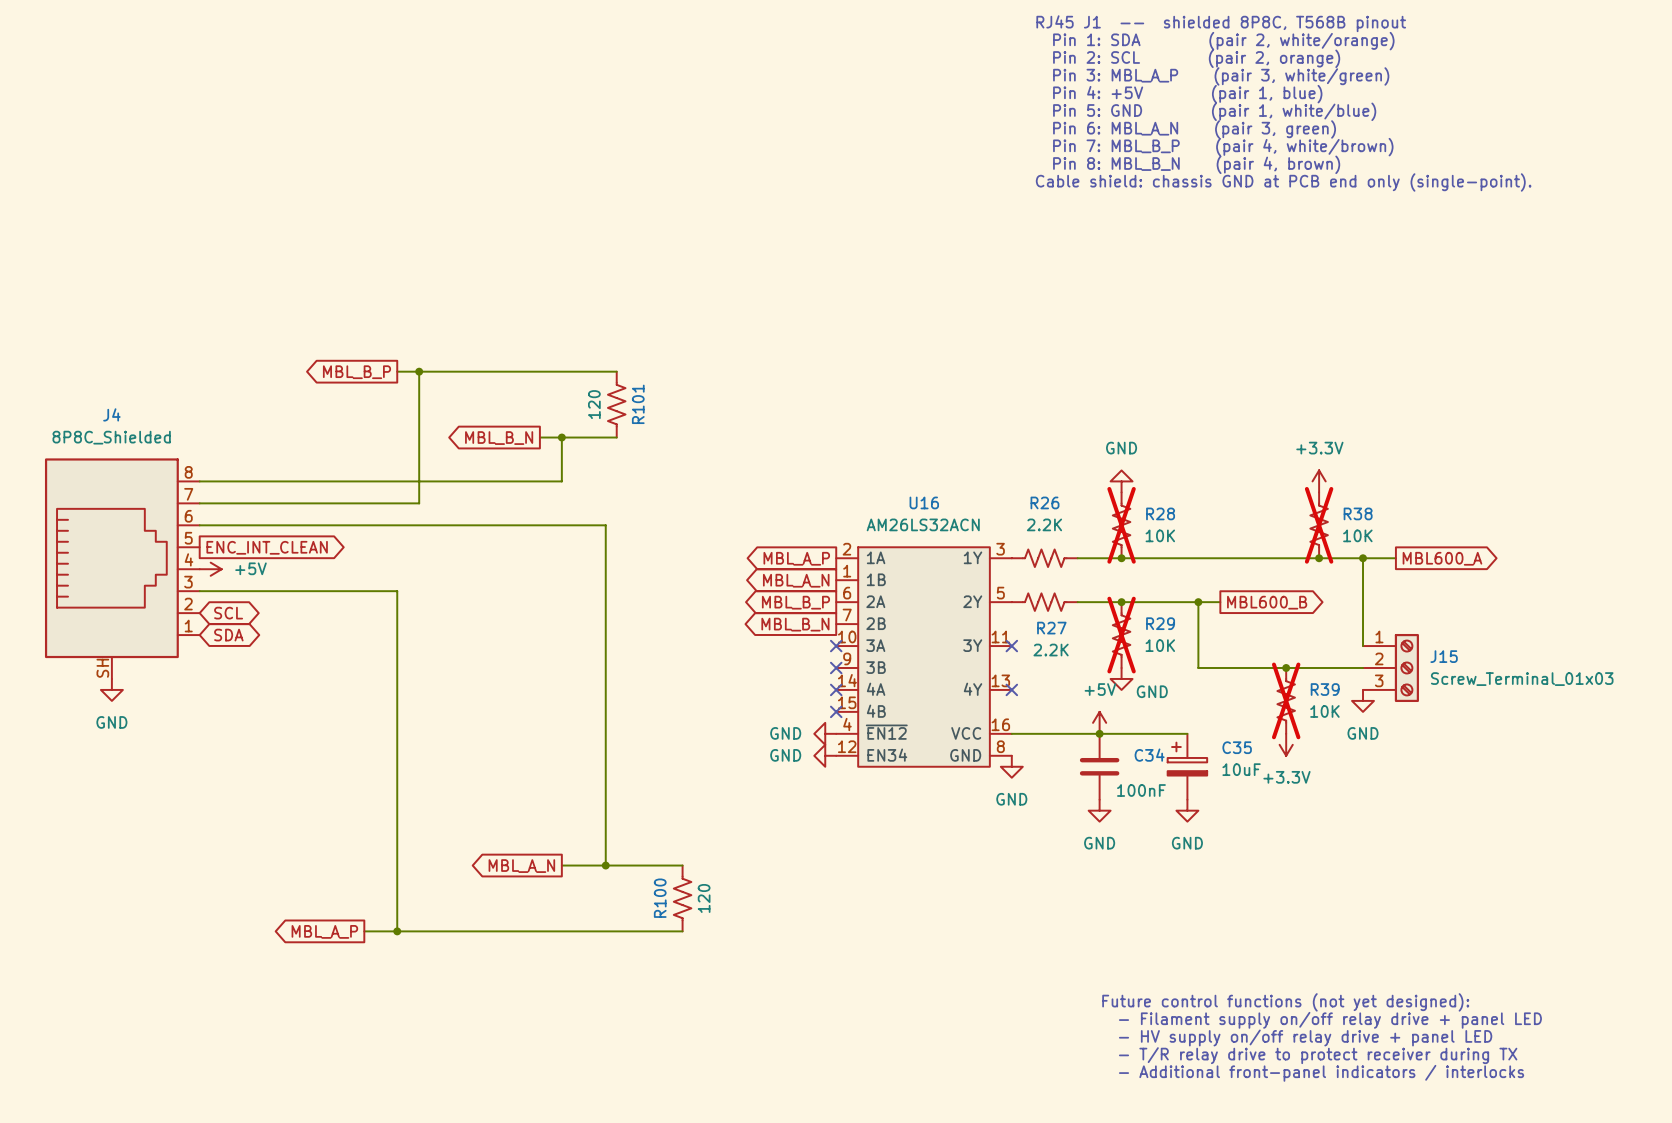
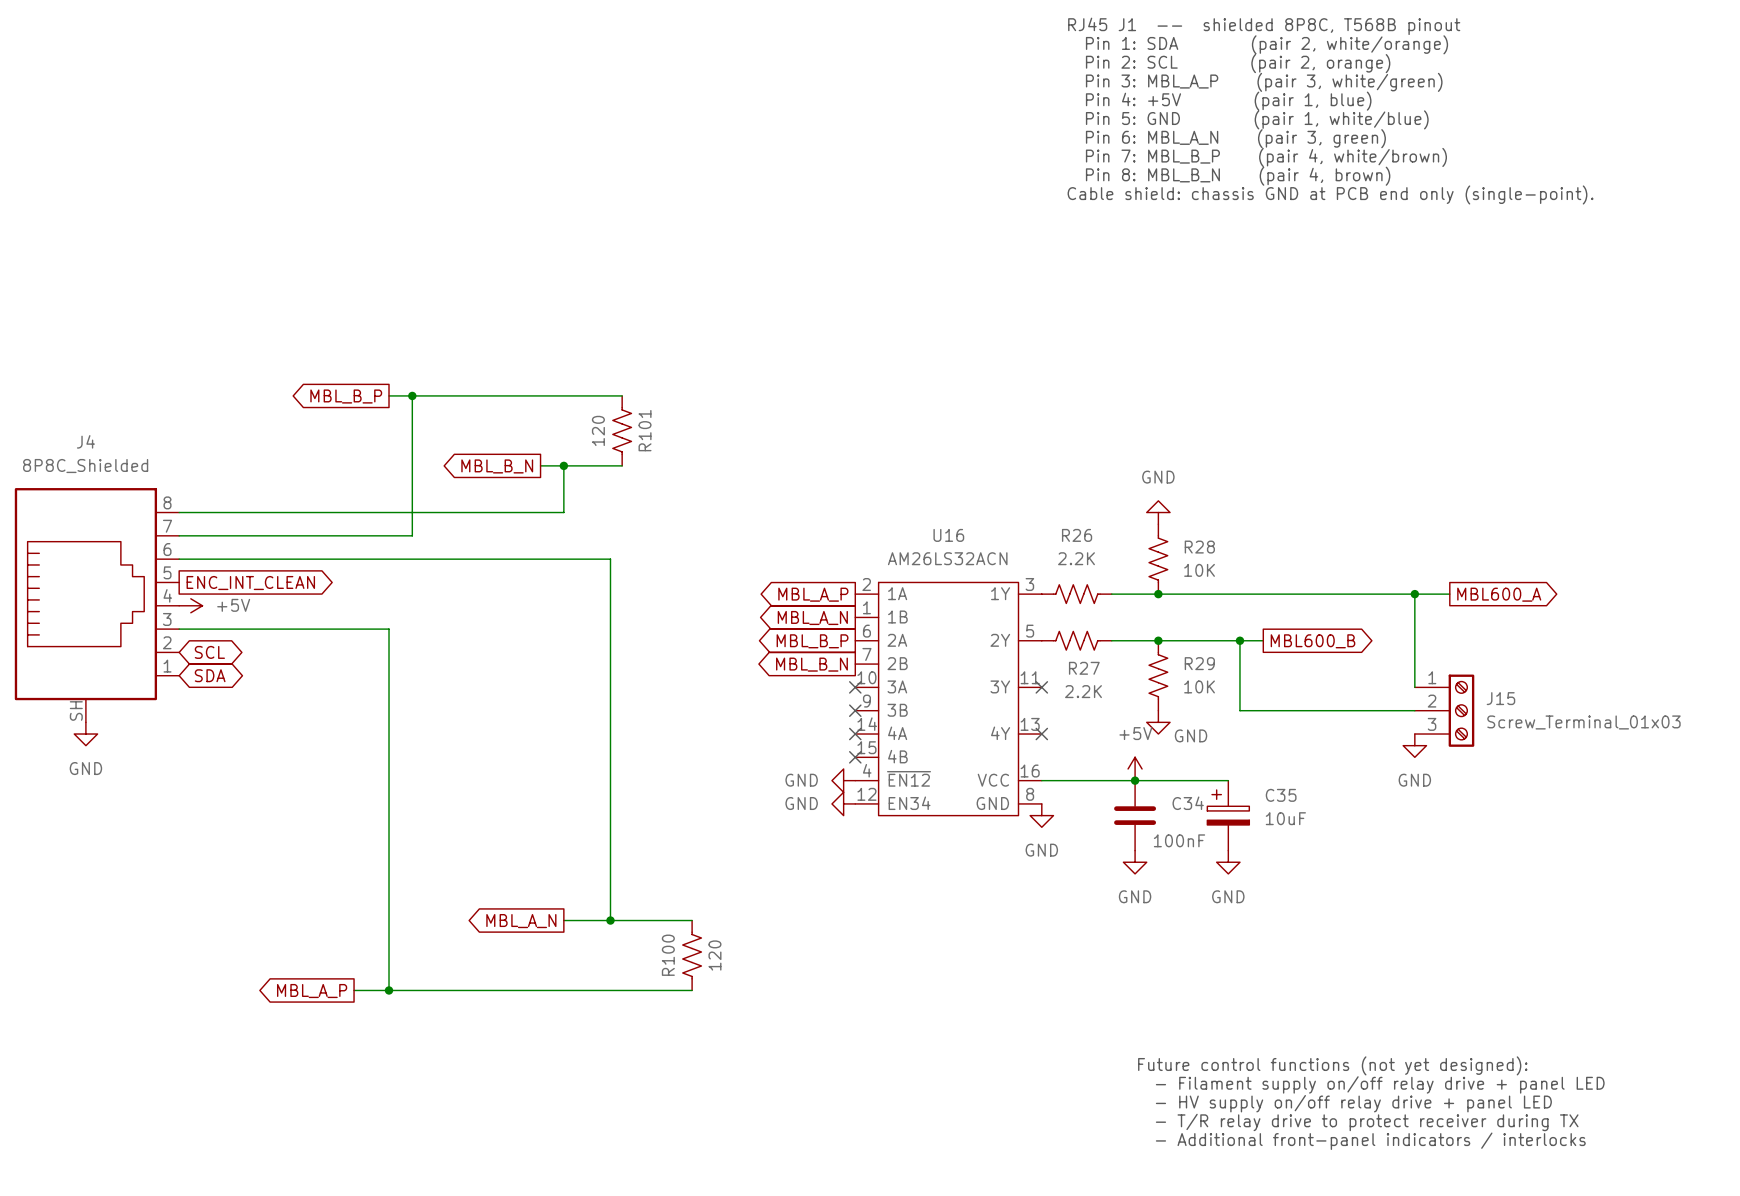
power symbol: +3.3V (1319, 481) -> none
R28 do-not-place cross: (1121, 525) -> none
R38: 10K (1319, 525) -> none
junction: (1319, 558) -> none
R29 do-not-place cross: (1121, 635) -> none
junction: (1286, 667) -> none
R39: 10K (1286, 700) -> none
power symbol: +3.3V (1286, 744) -> none

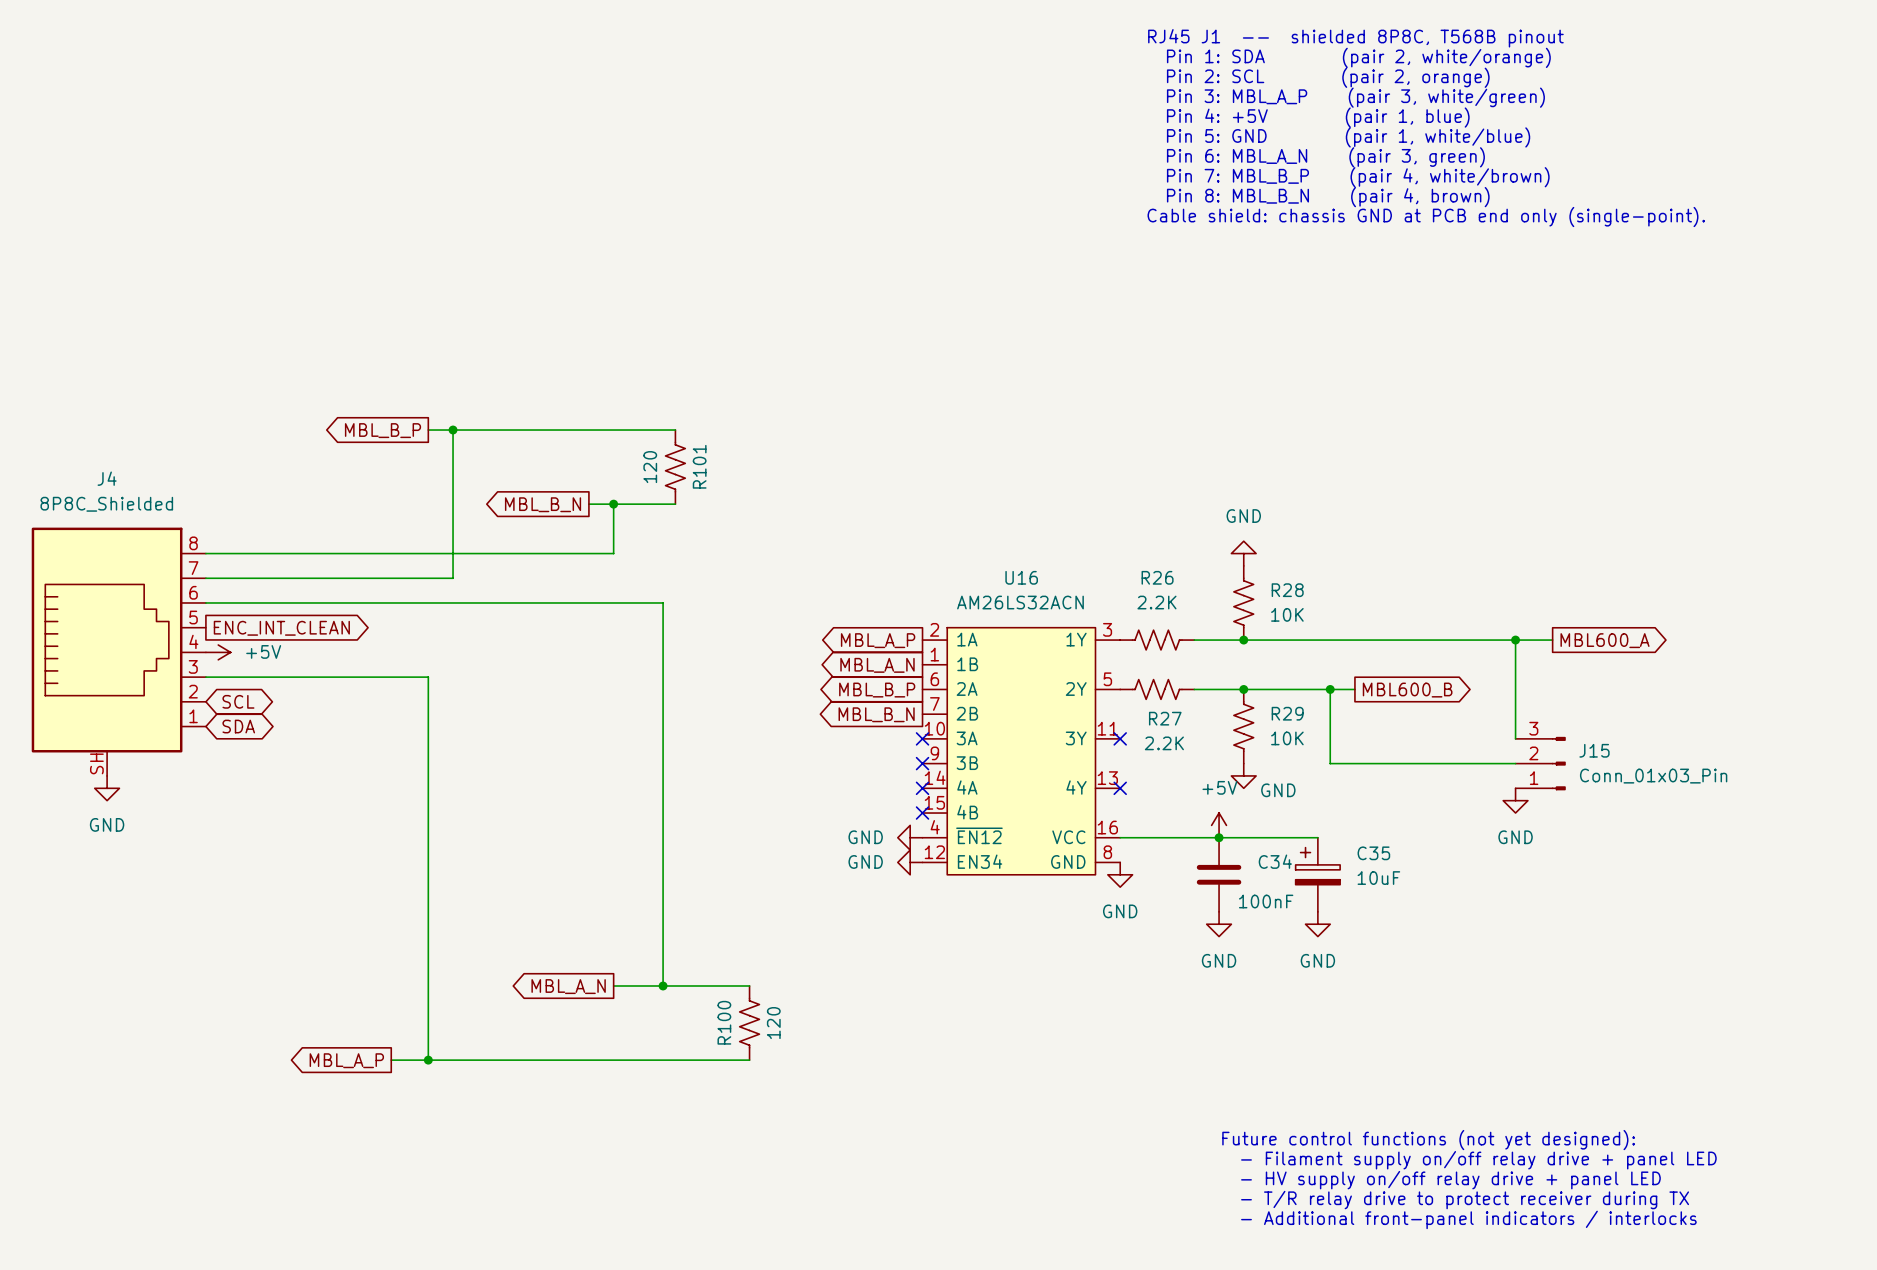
J15 symbol: [1414, 674, 1475, 747] -> [1515, 736, 1566, 791]
J15 value: Screw_Terminal_01x03 (1583, 722) -> Conn_01x03_Pin (1653, 776)

